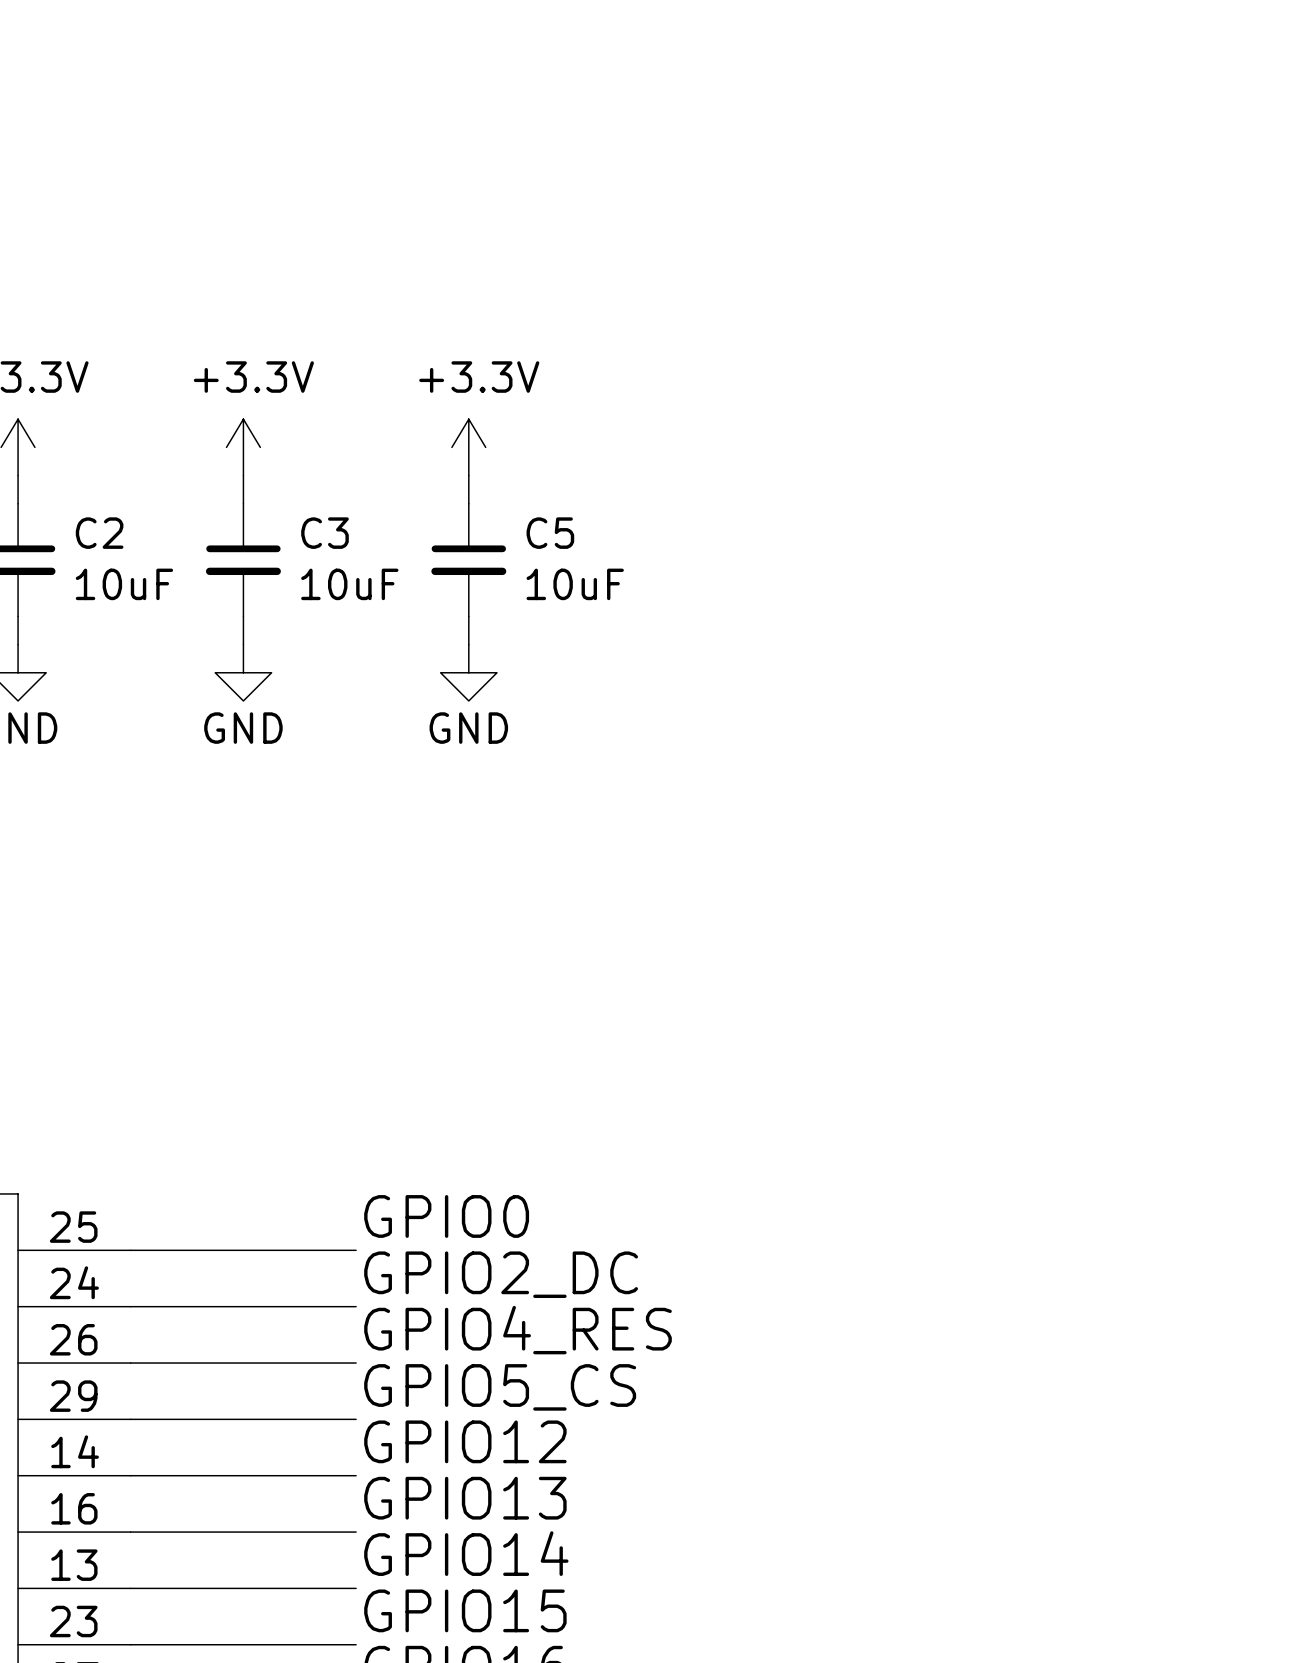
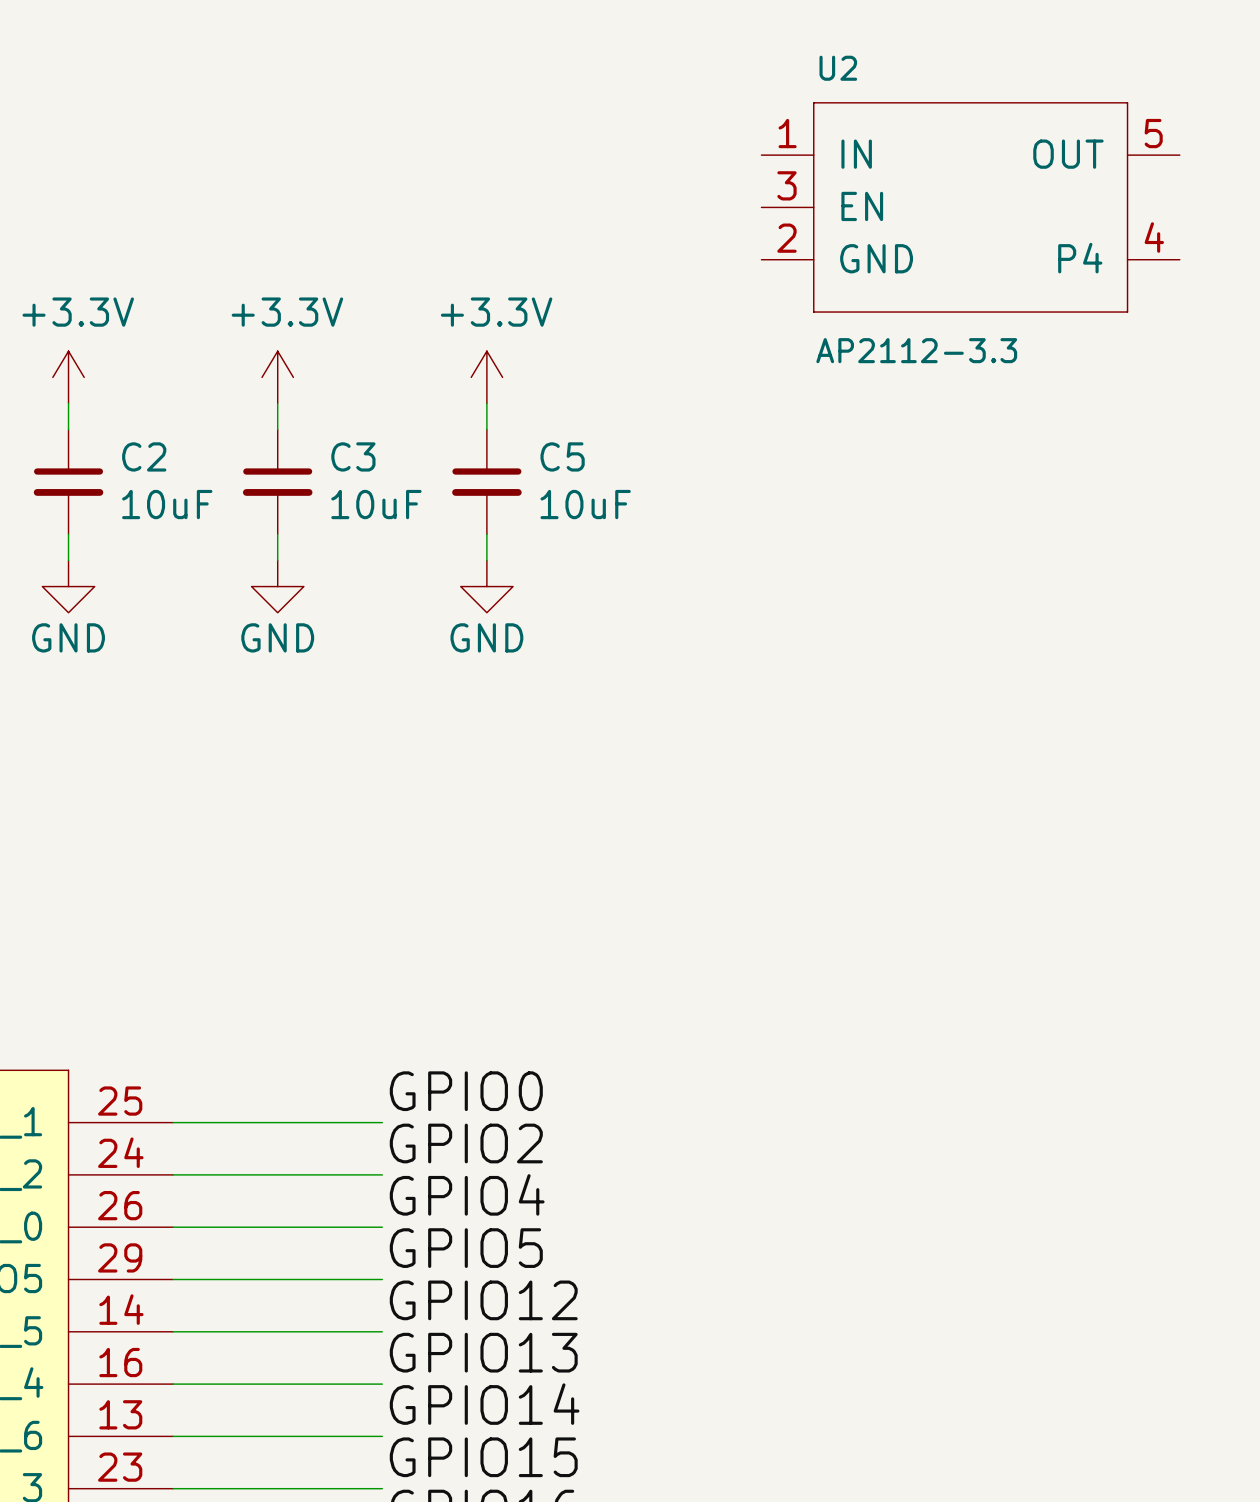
U2: none -> AP2112-3.3 (970, 207)
label: GPIO2_DC (501, 1274) -> GPIO2 (466, 1143)
label: GPIO4_RES (517, 1330) -> GPIO4 (467, 1194)
label: GPIO5_CS (500, 1387) -> GPIO5 (466, 1248)

